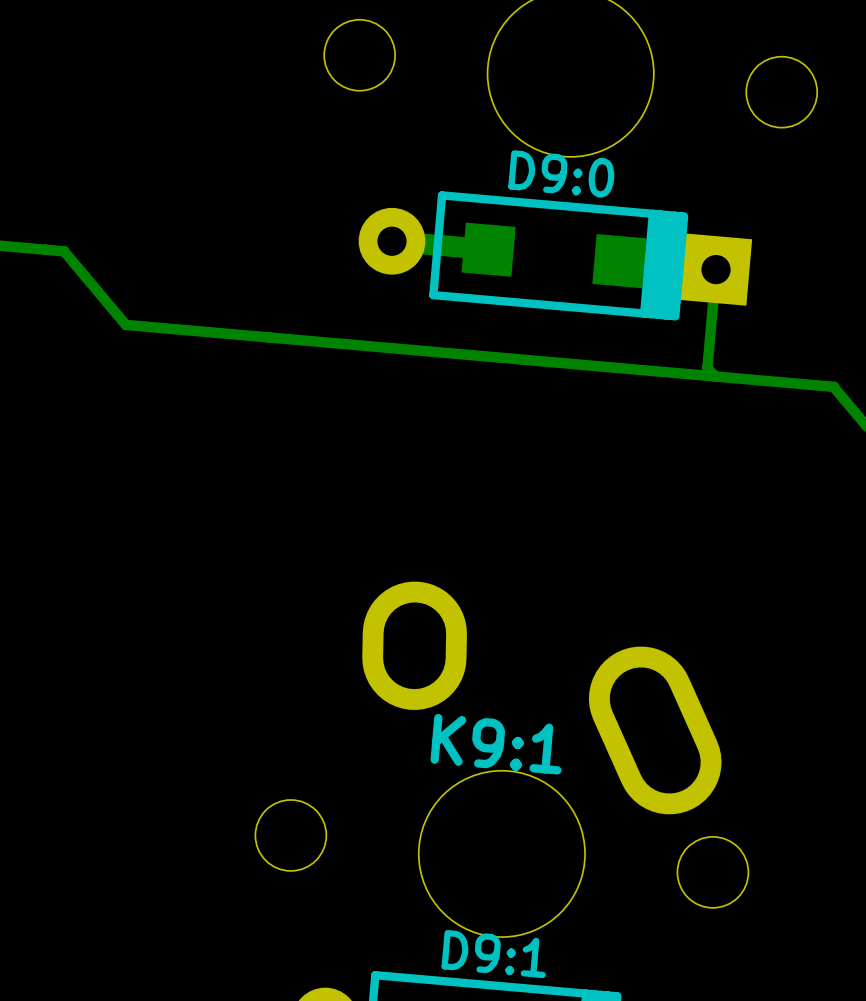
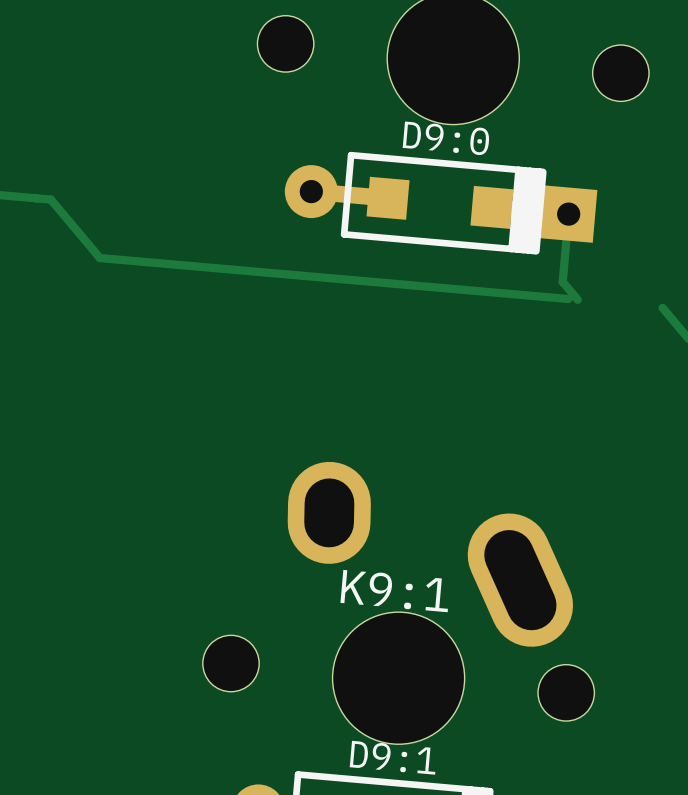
track: (716, 269) (707, 366) (715, 376) (834, 386) -> (568, 214) (562, 281) (577, 299)

